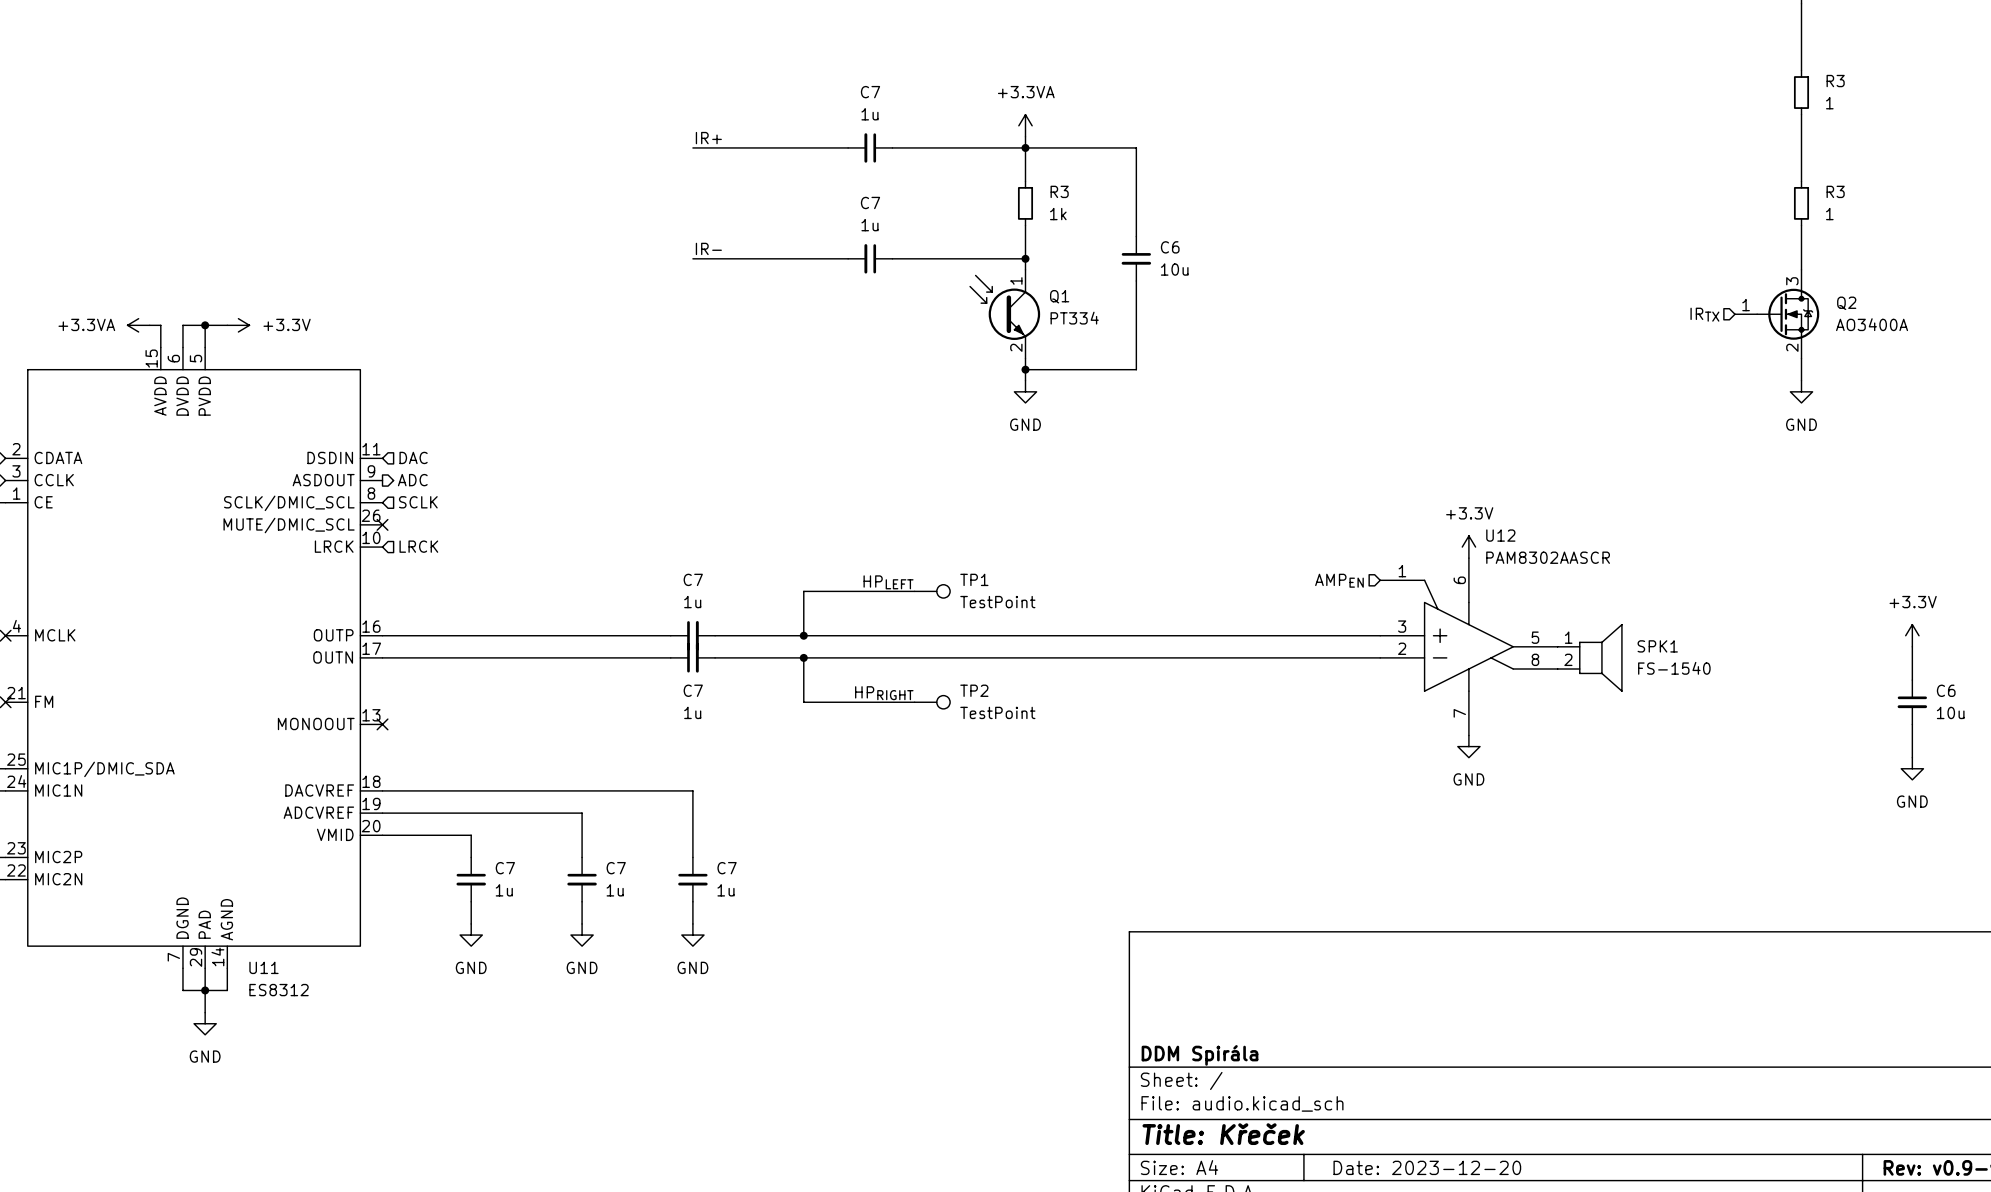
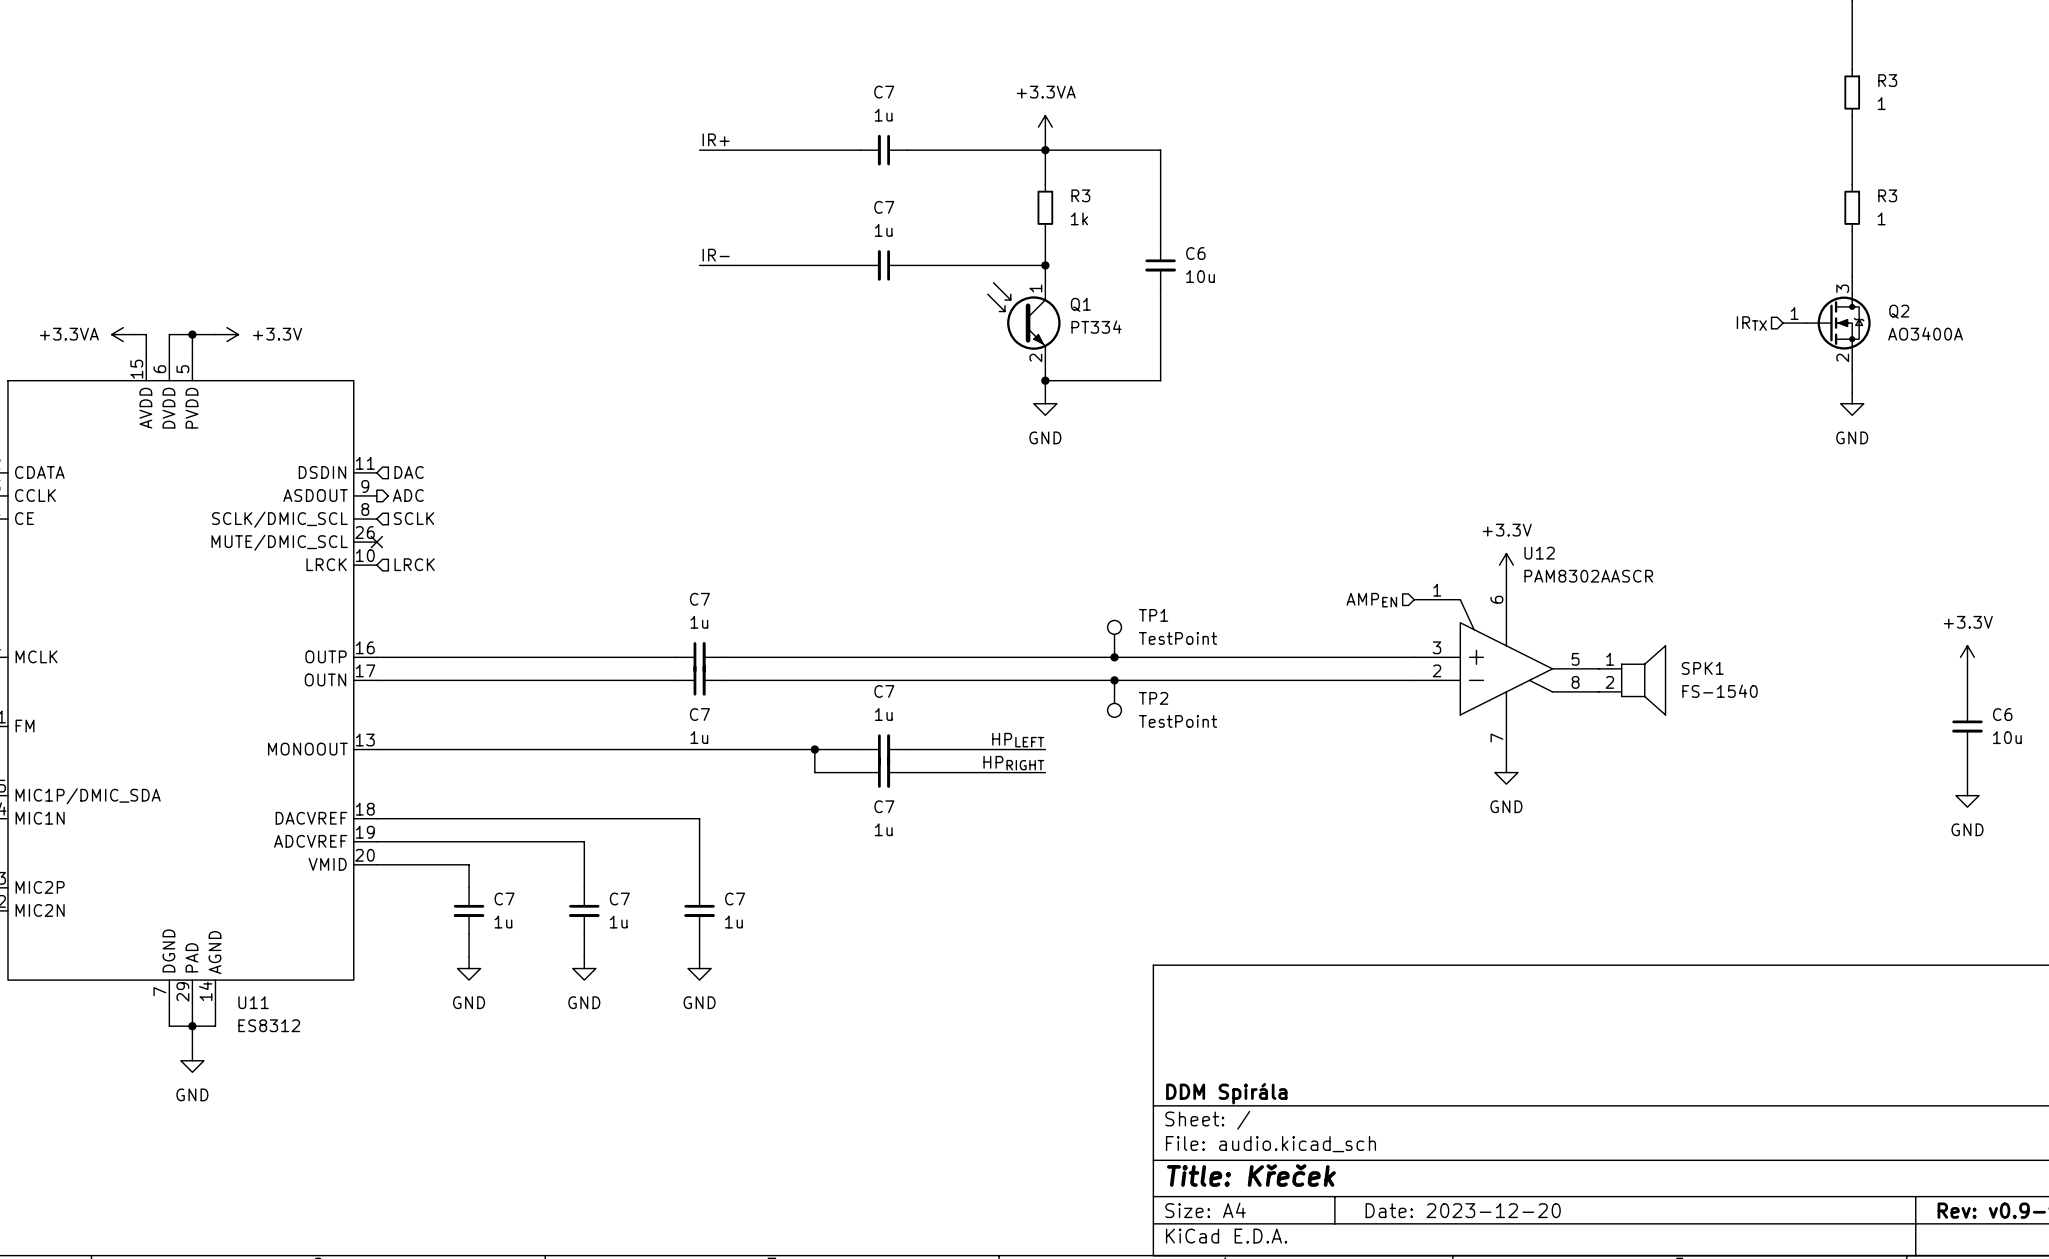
label position: HPLEFT (888, 582) -> HPLEFT (1018, 740)
wire: (914, 591) (803, 591) (803, 635) -> none
TP1 position: (932, 591) -> (1114, 638)
TP1 rotation: 0° (943, 591) -> 90° counterclockwise (1114, 627)
junction: (803, 635) -> none
junction: none -> (1114, 657)
wire: (803, 657) (803, 702) (914, 702) -> none
junction: (803, 657) -> none
junction: none -> (1114, 680)
label position: HPRIGHT (884, 693) -> HPRIGHT (1013, 763)
TP2 position: (932, 702) -> (1114, 698)
TP2 rotation: 0° (943, 702) -> 90° clockwise (1114, 710)
wire: none -> (376, 749) (860, 749)
no-connect mark: (382, 724) -> none
wire: none -> (814, 749) (814, 772) (860, 772)
junction: none -> (814, 749)
C7: none -> 1u (883, 749)
wire: none -> (907, 749) (1045, 749)
C7: none -> 1u (883, 772)
wire: none -> (907, 772) (1045, 772)

